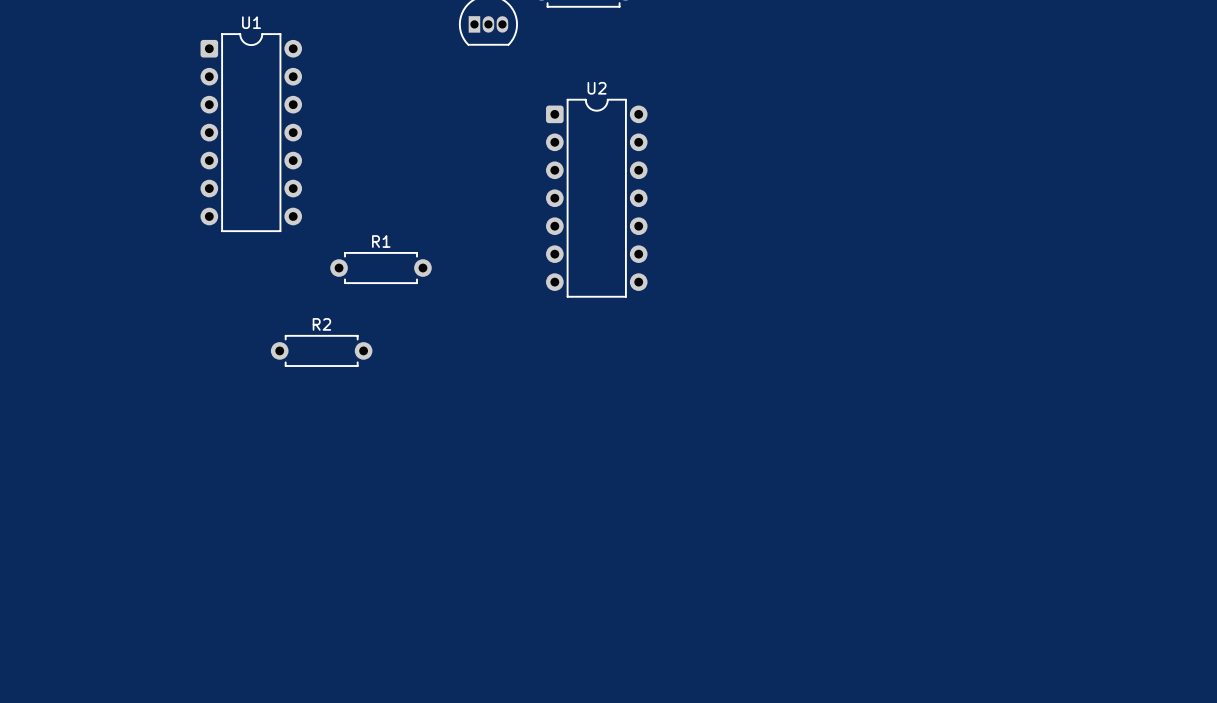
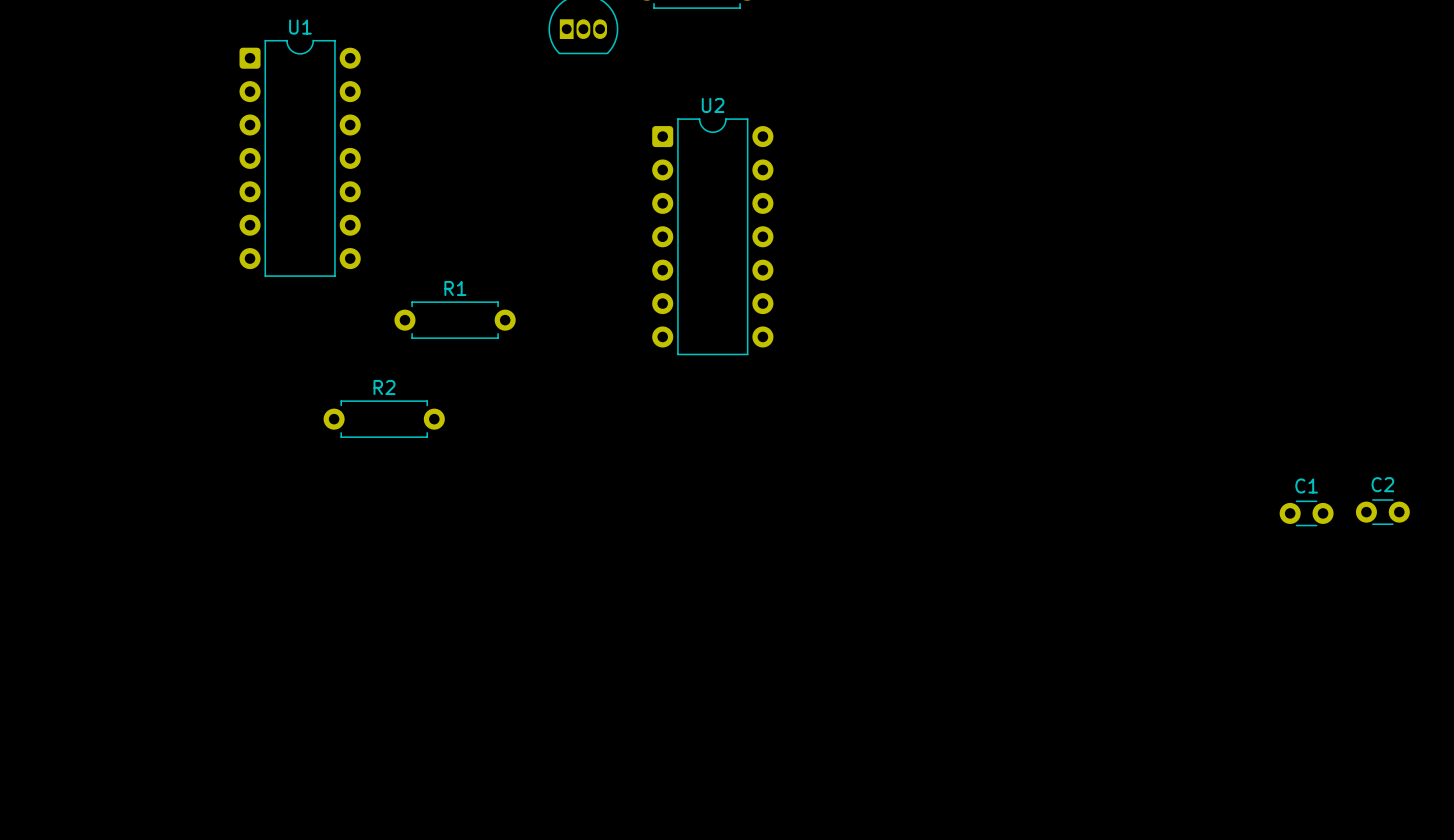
C2: none -> (1382, 512)
C1: none -> (1306, 513)

